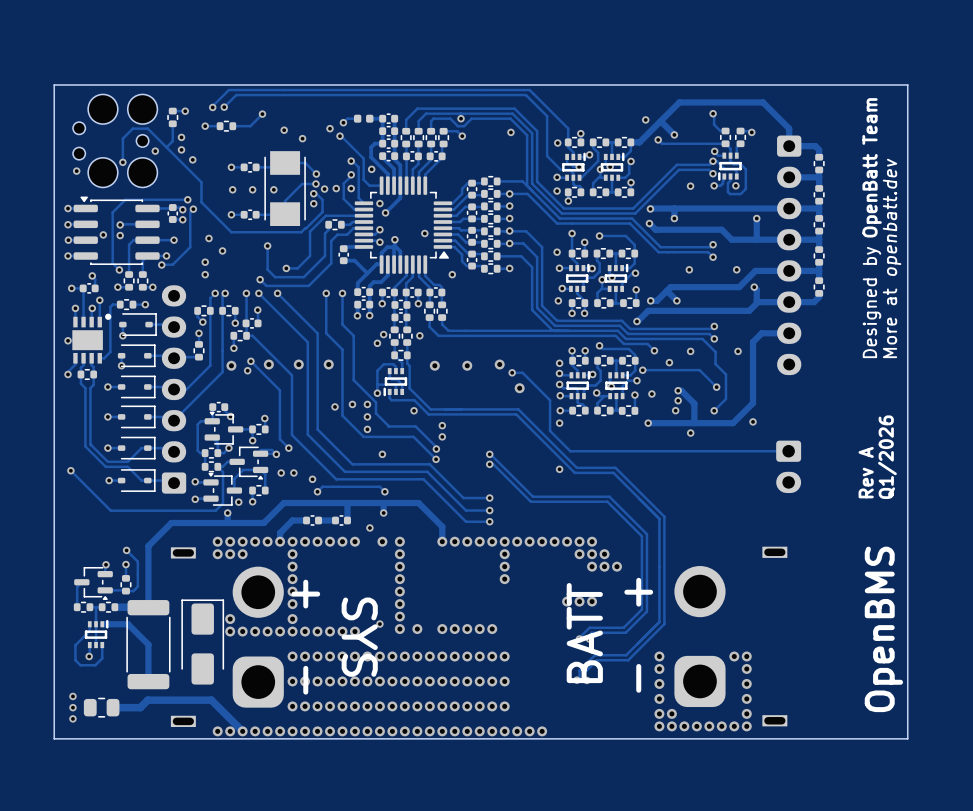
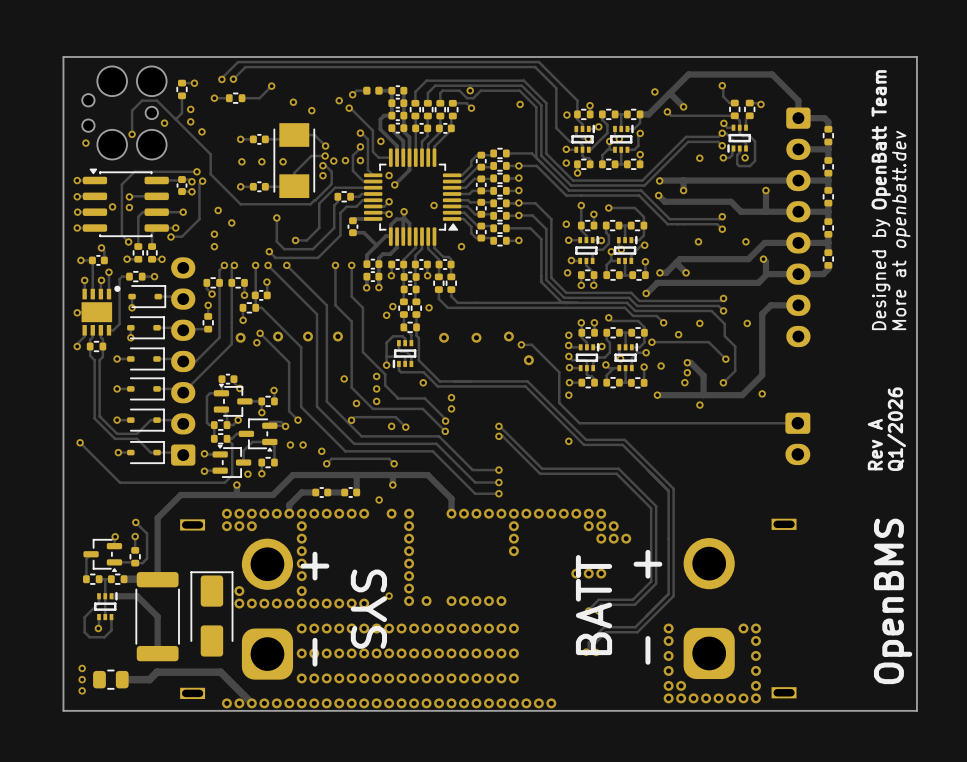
via: (352, 404) -> none
via: none -> (356, 403)
track: none -> (351, 420) (354, 417) (395, 417) (405, 427)
via: none -> (351, 420)
via: none -> (405, 427)

